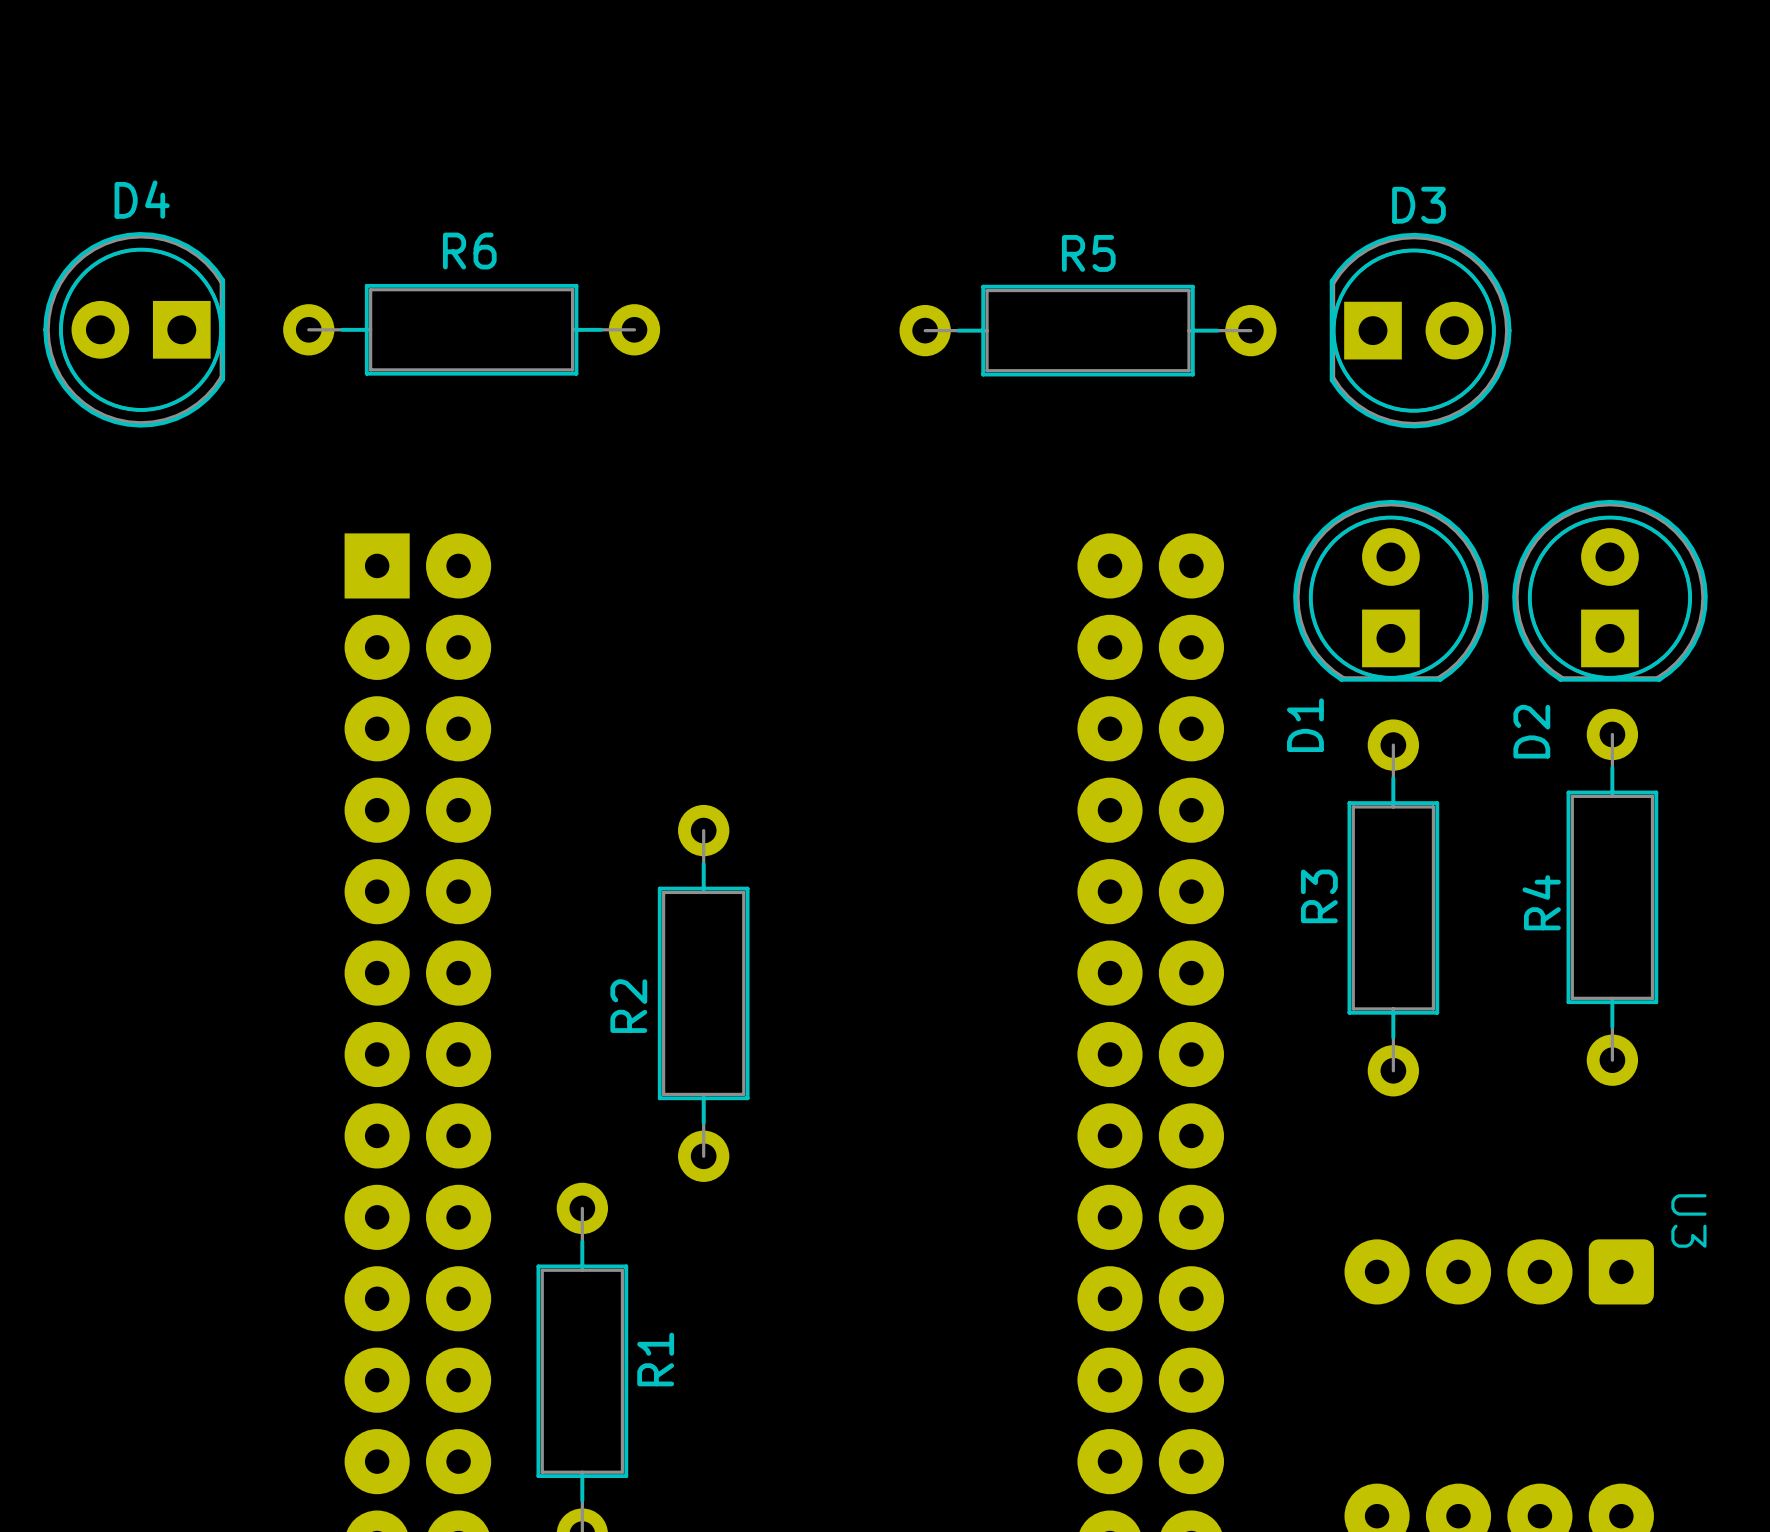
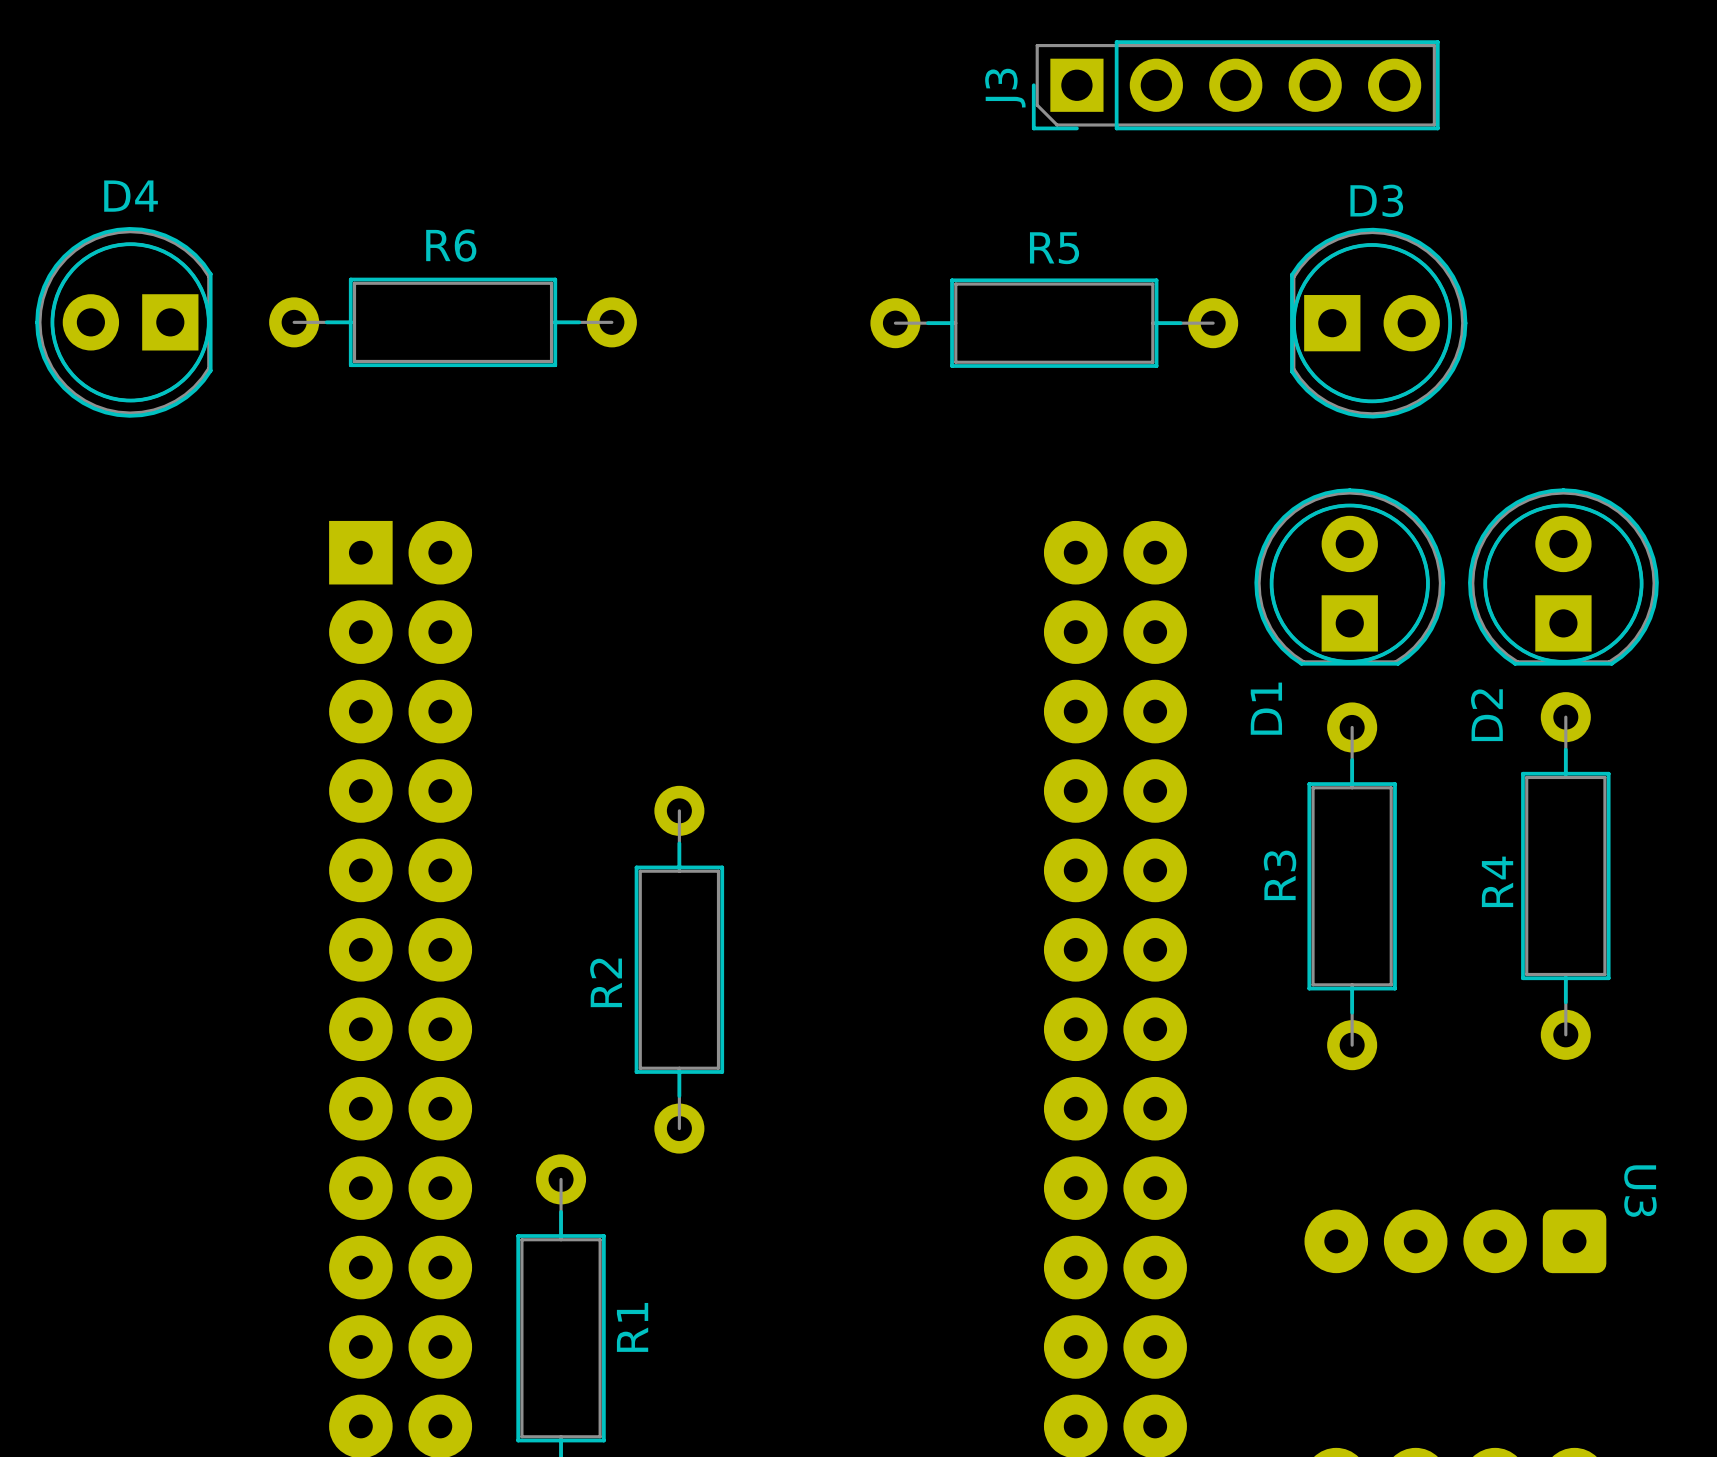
J3: none -> (1235, 85)

